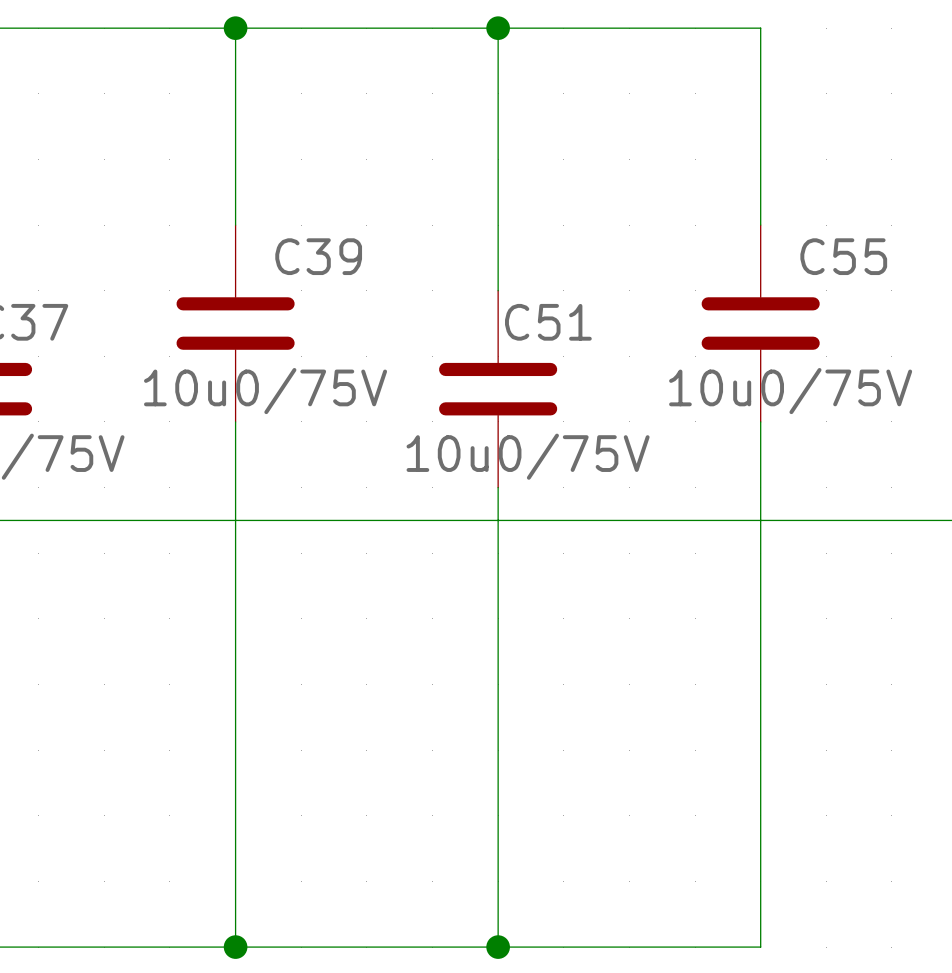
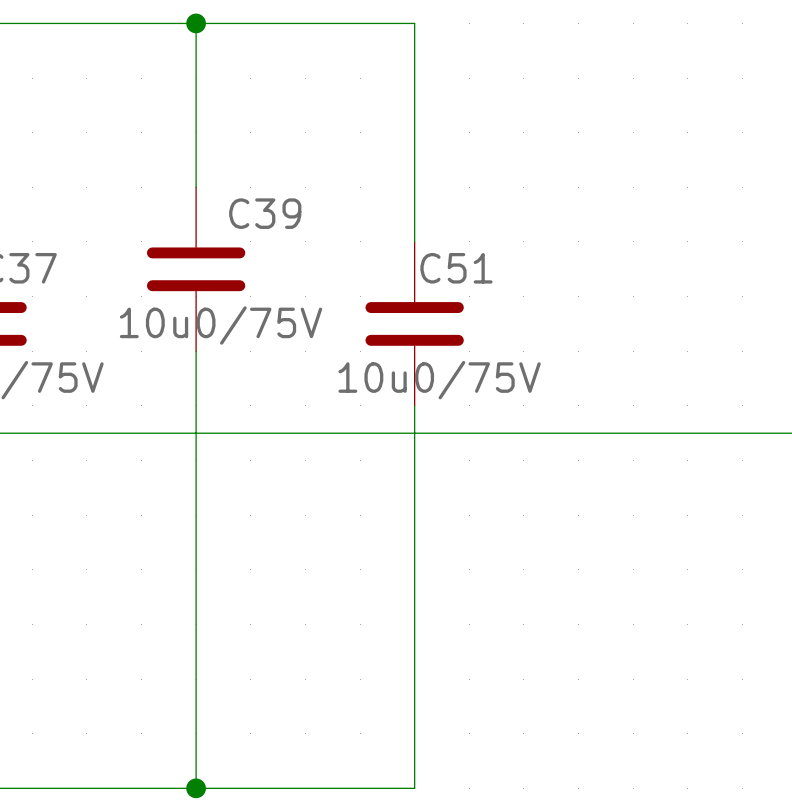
wire: (498, 28) (760, 28) (760, 225) -> none
junction: (498, 28) -> none
C55: 10u0/75V (760, 323) -> none
wire: (760, 421) (760, 947) (498, 947) -> none
junction: (498, 947) -> none

